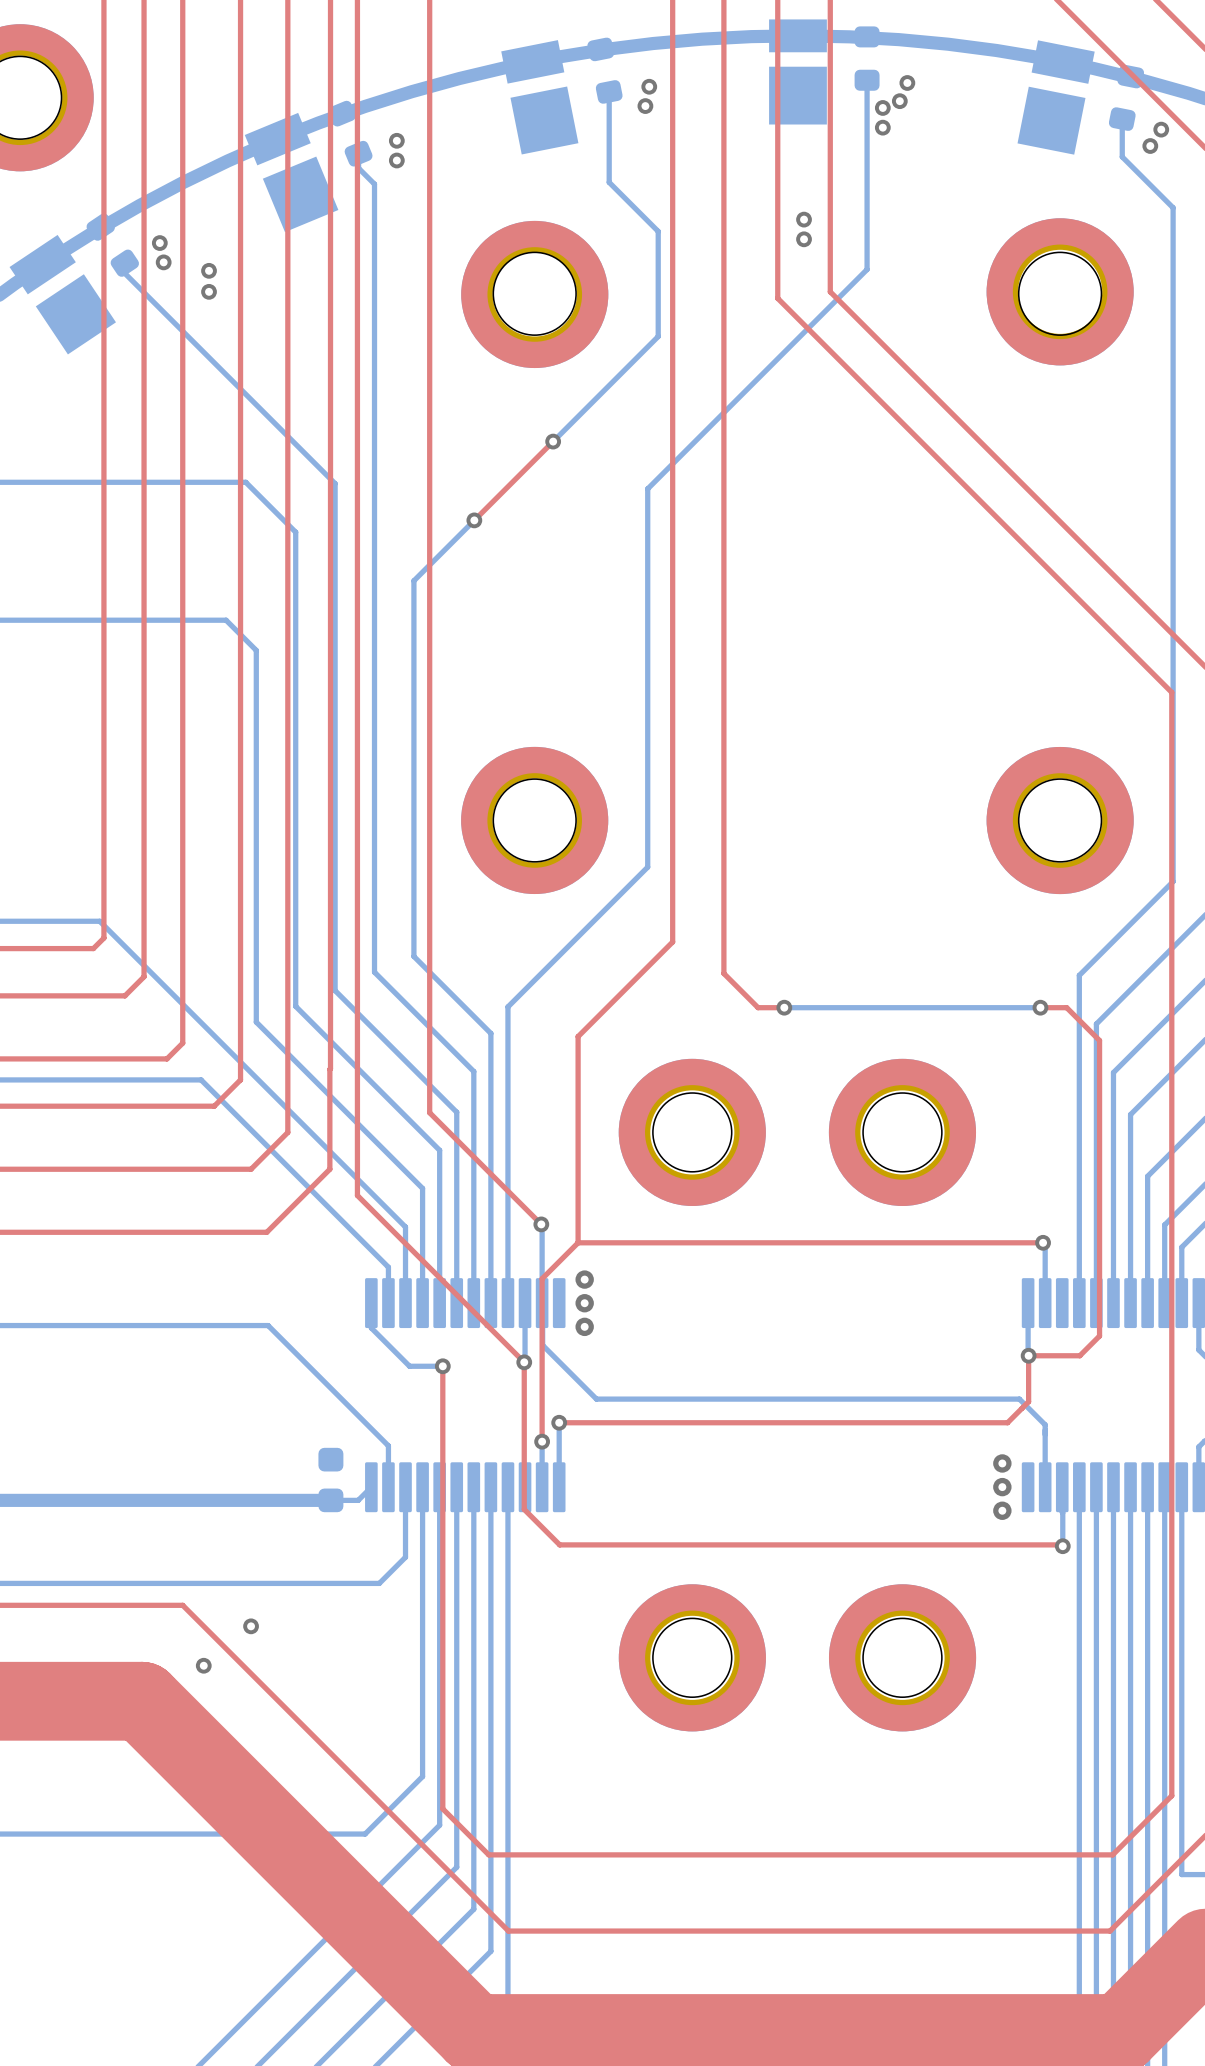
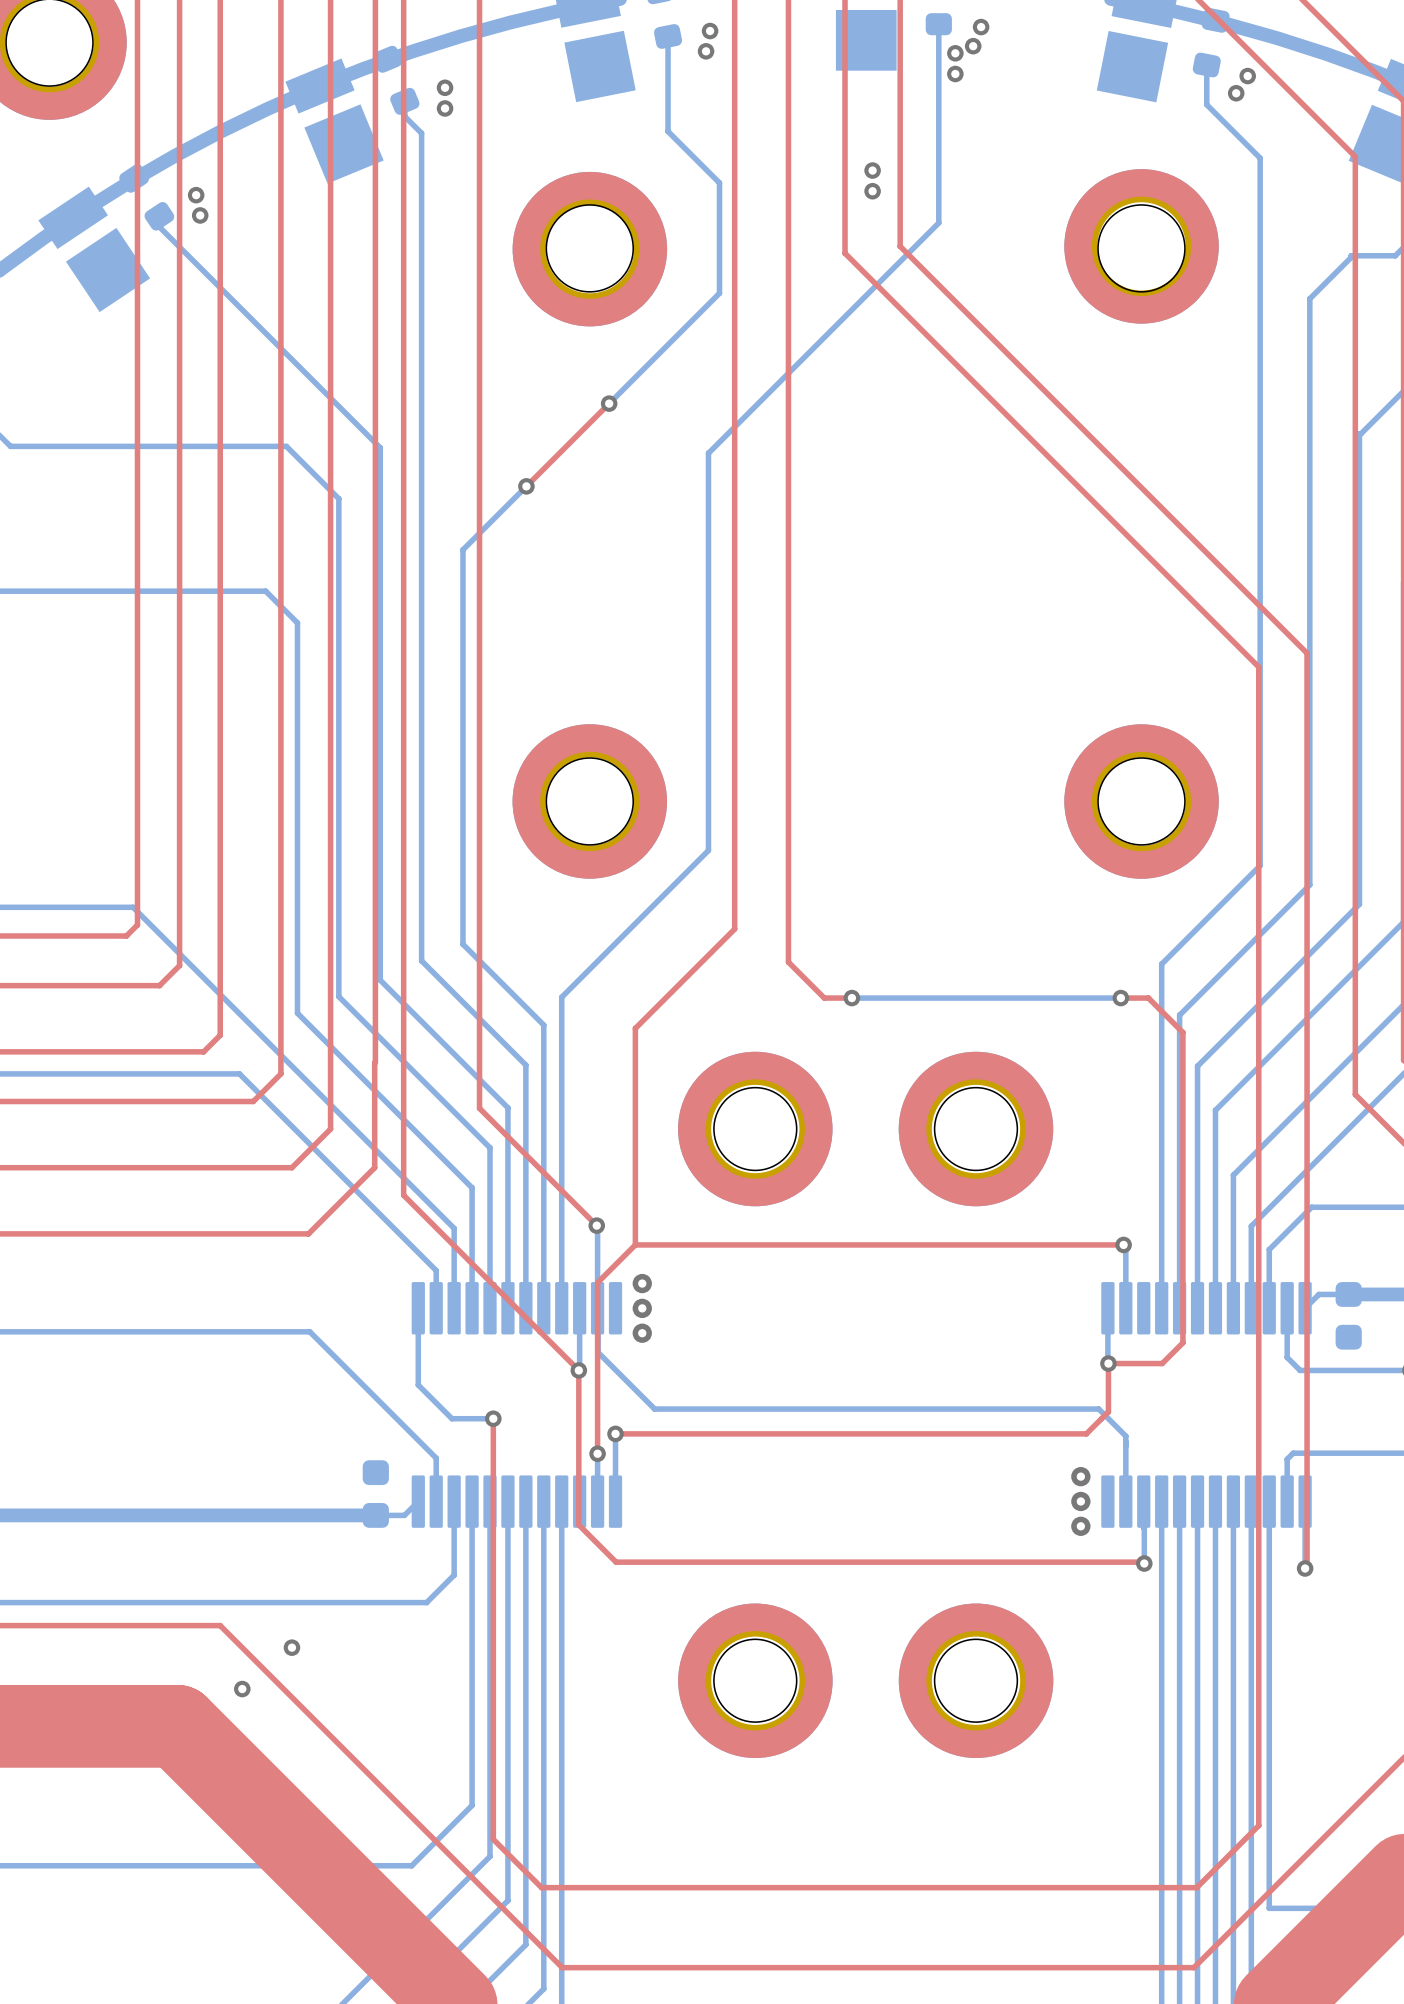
via: (209, 270) -> none
via: (209, 291) -> none
bottom track: (371, 1328) (409, 1366) (442, 1366) -> (418, 1334) (418, 1385) (451, 1418) (493, 1418)
top track: (442, 1366) (442, 1408) -> none
via position: (442, 1366) -> (493, 1418)

